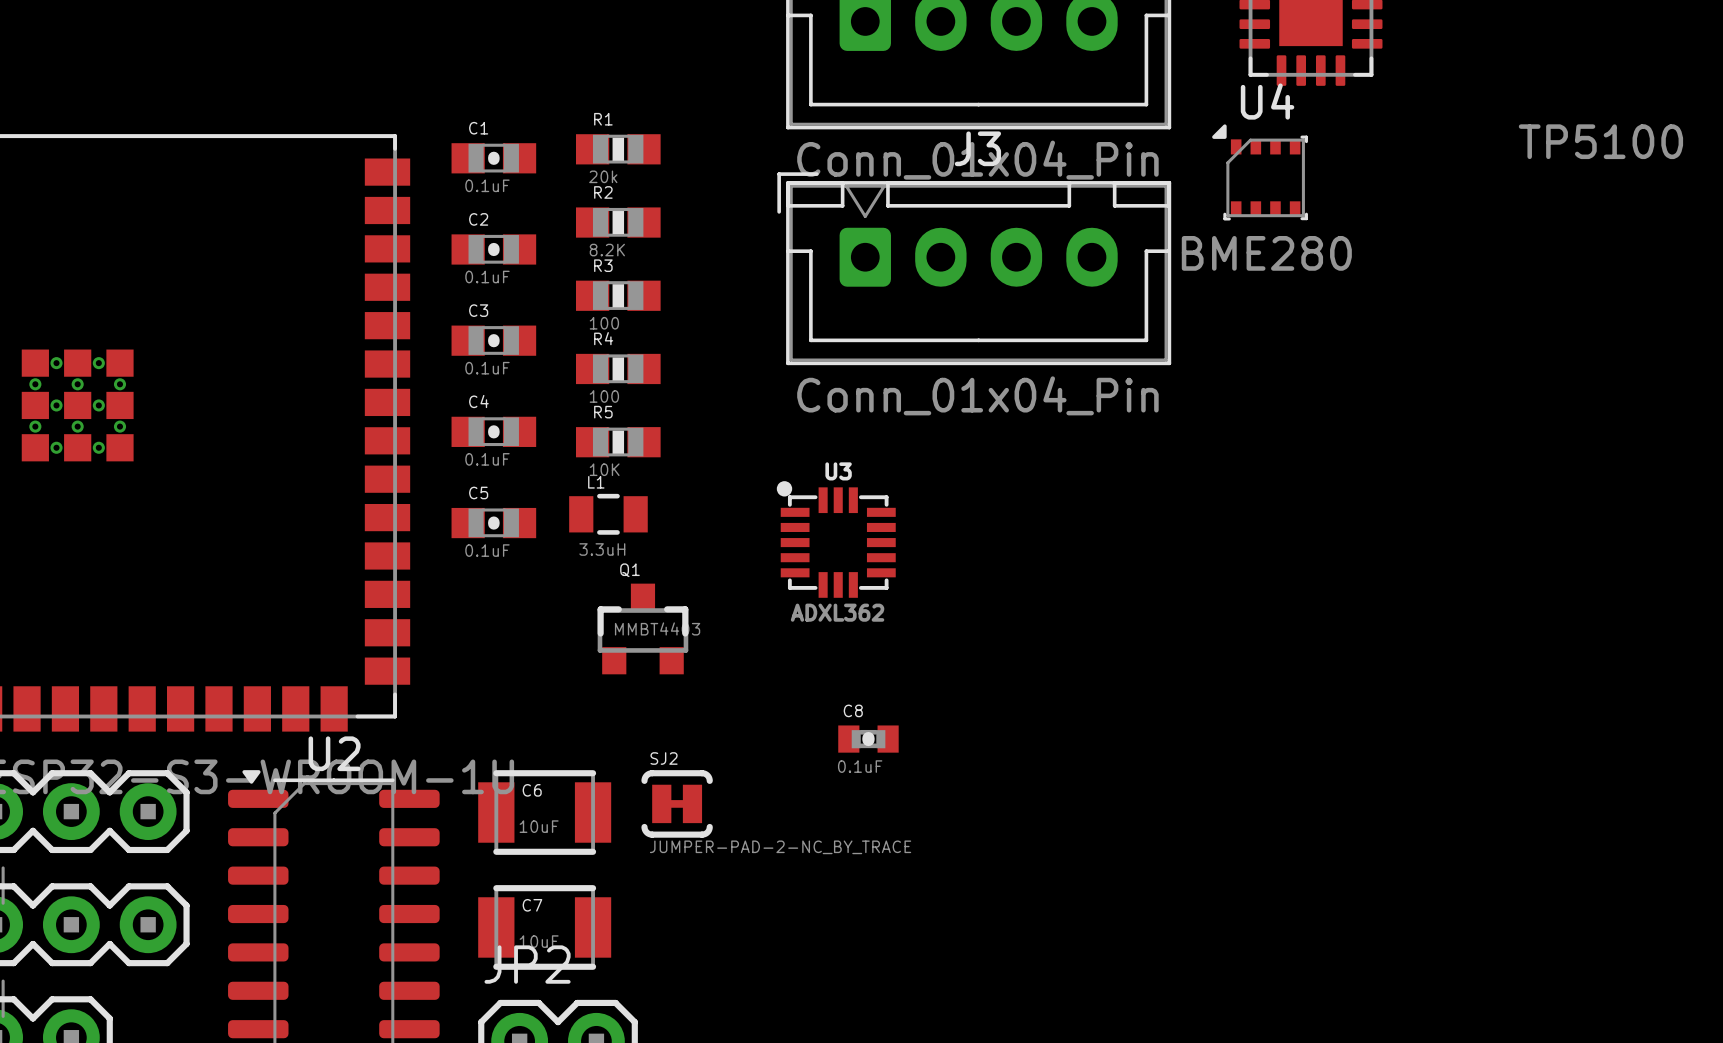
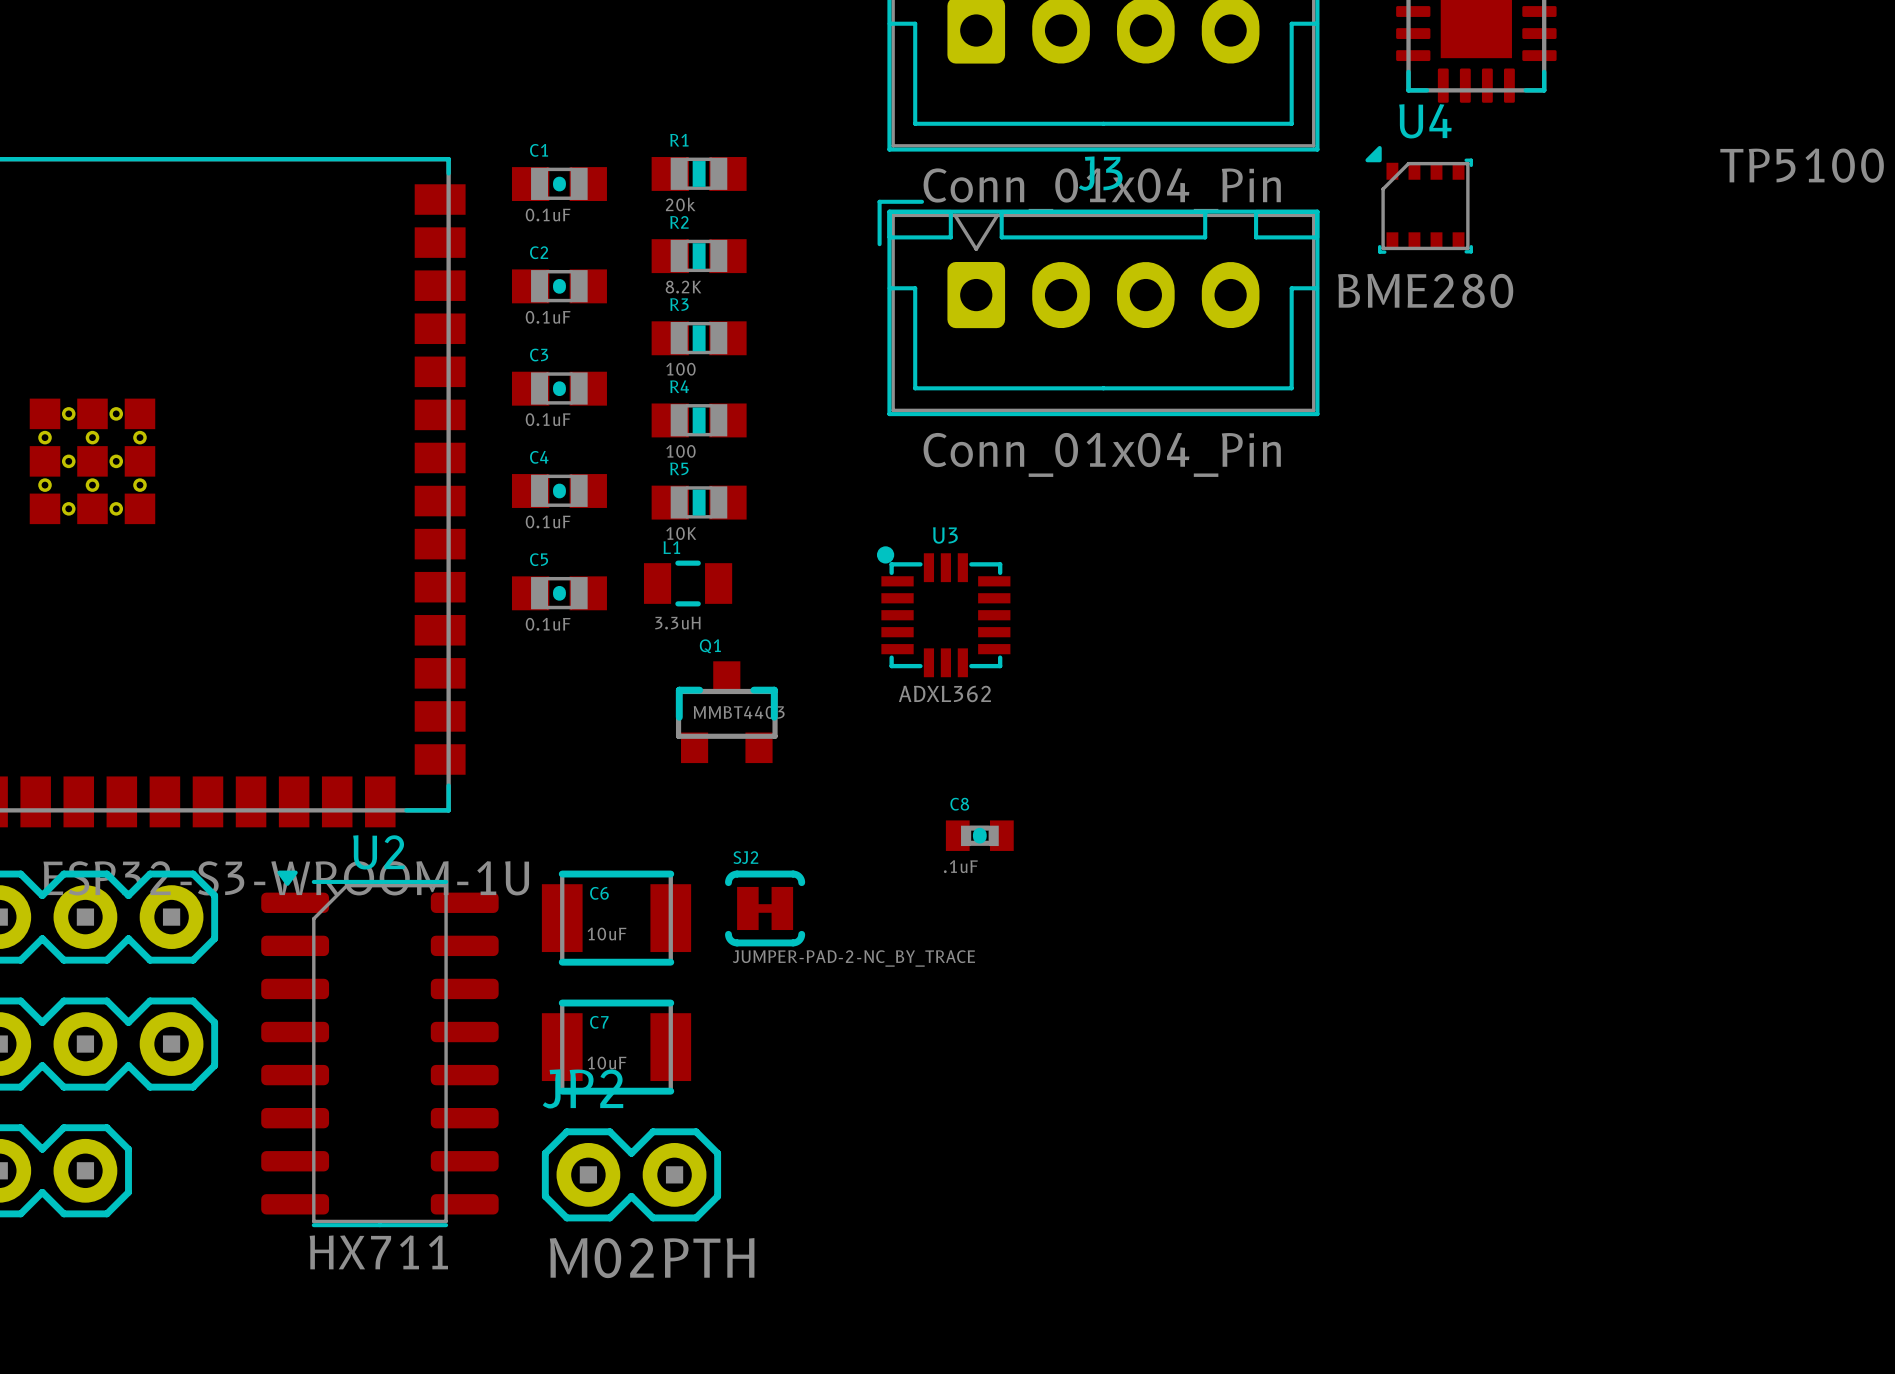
C8 value: 0.1uF (860, 766) -> .1uF (960, 866)

